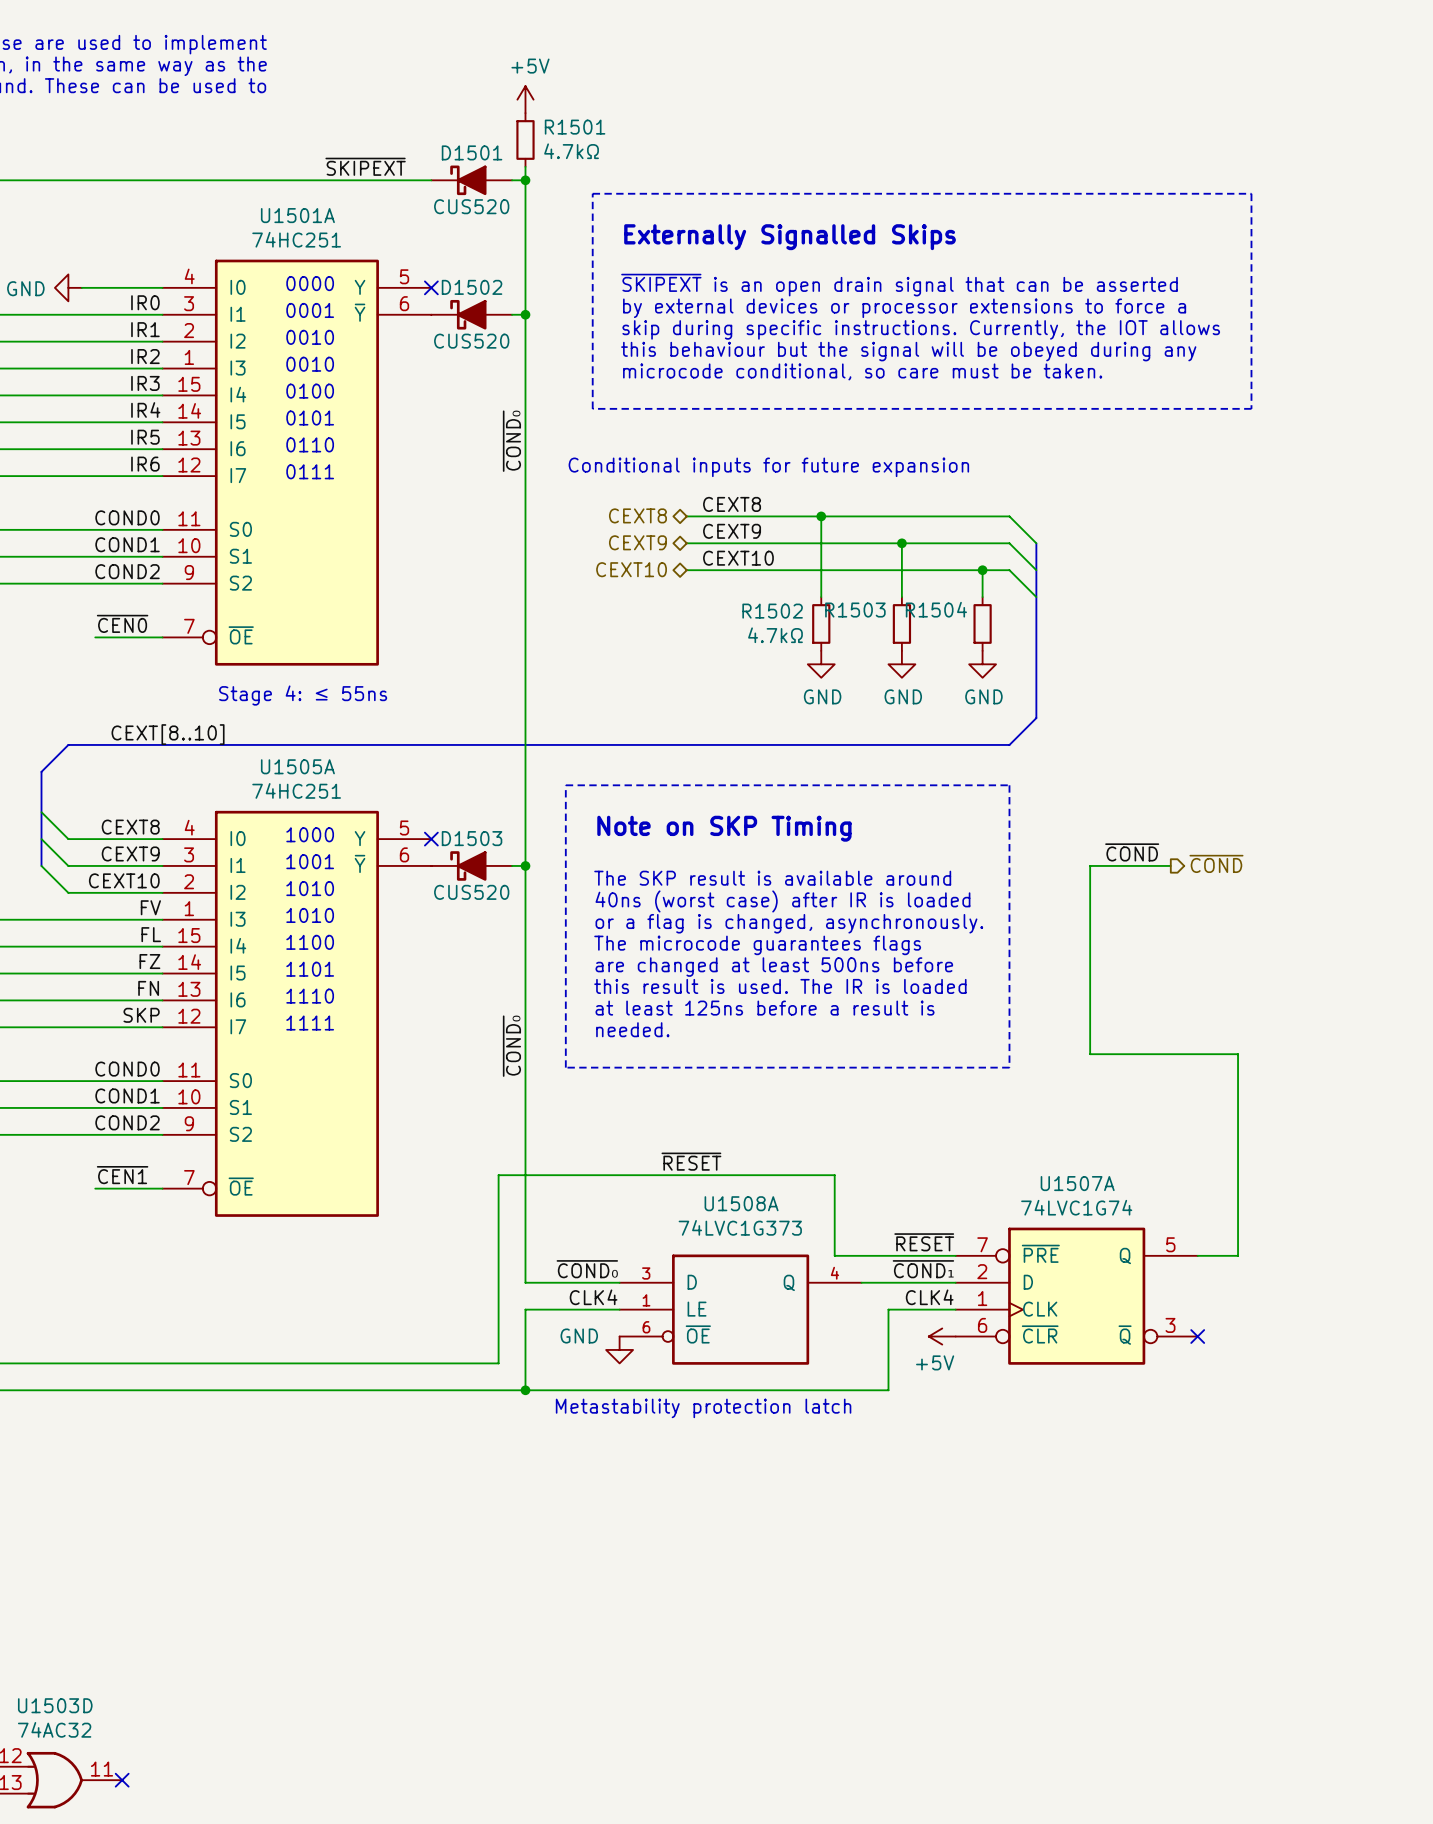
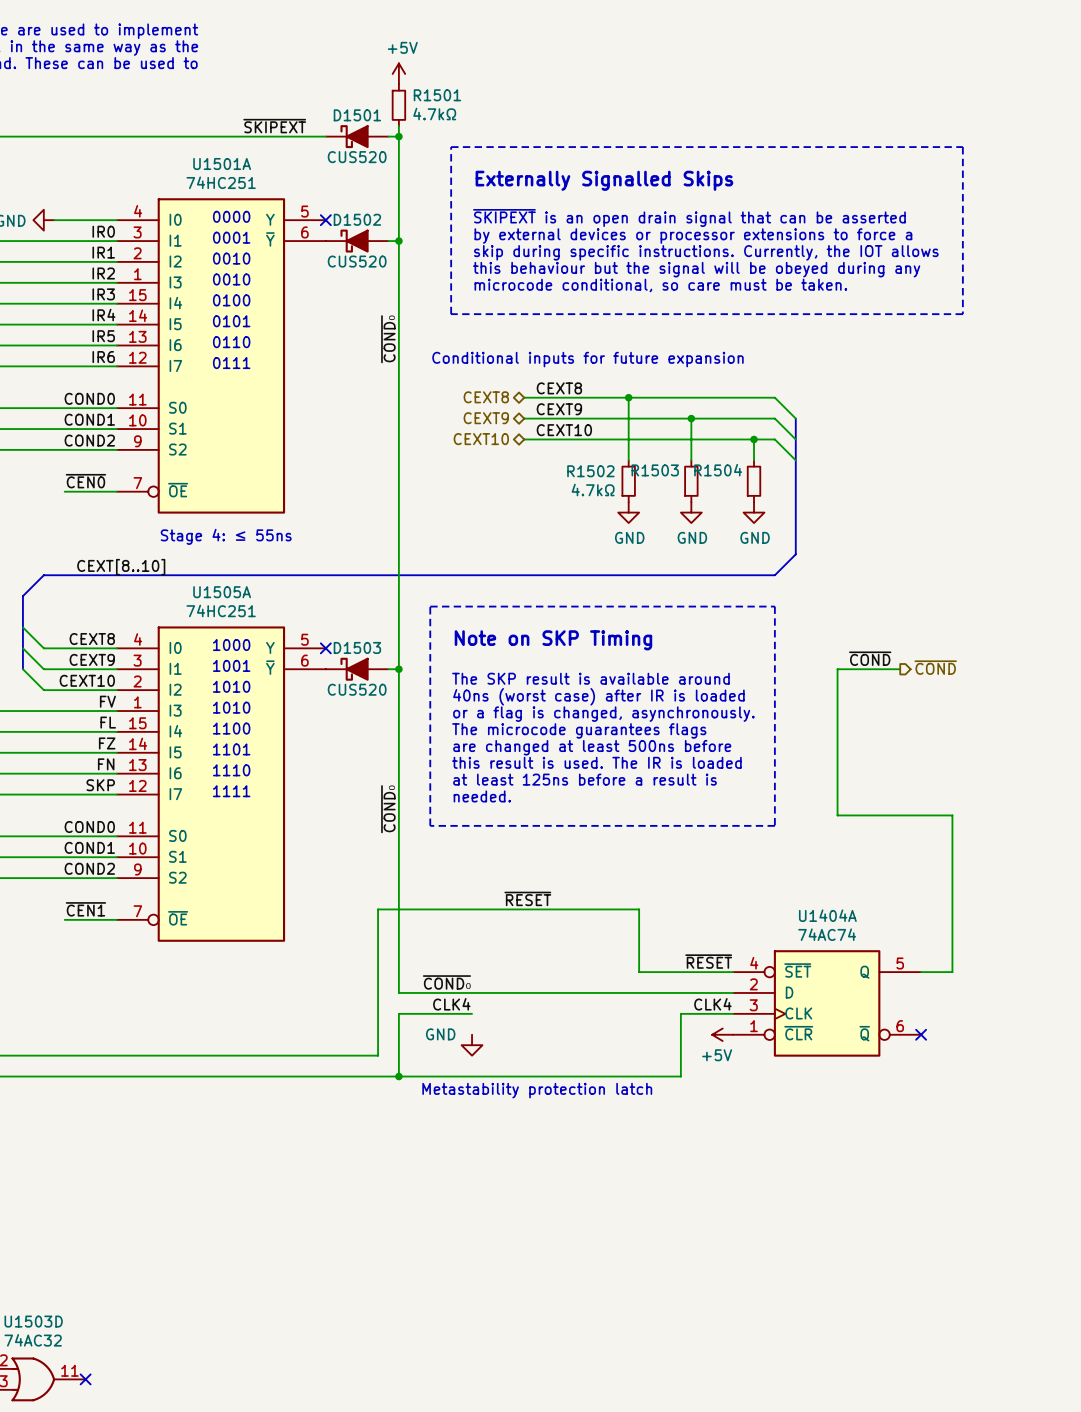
U1507A name: U1507A (1077, 1183) -> U1404A (827, 915)
U1507A value: 74LVC1G74 (1076, 1207) -> 74AC74 (827, 934)
U1507A pin number: 7 (982, 1244) -> 4 (754, 963)
U1507A pin name: ~{PRE} (1040, 1253) -> ~{SET} (797, 970)
label: ~{COND₁} (923, 1269) -> none
wire: none -> (472, 992) (660, 992)
U1507A pin number: 1 (982, 1298) -> 3 (753, 1005)
U1508A: 74LVC1G373 (740, 1309) -> none
U1507A pin number: 6 (982, 1325) -> 1 (754, 1026)
U1507A pin number: 3 (1170, 1325) -> 6 (900, 1026)

